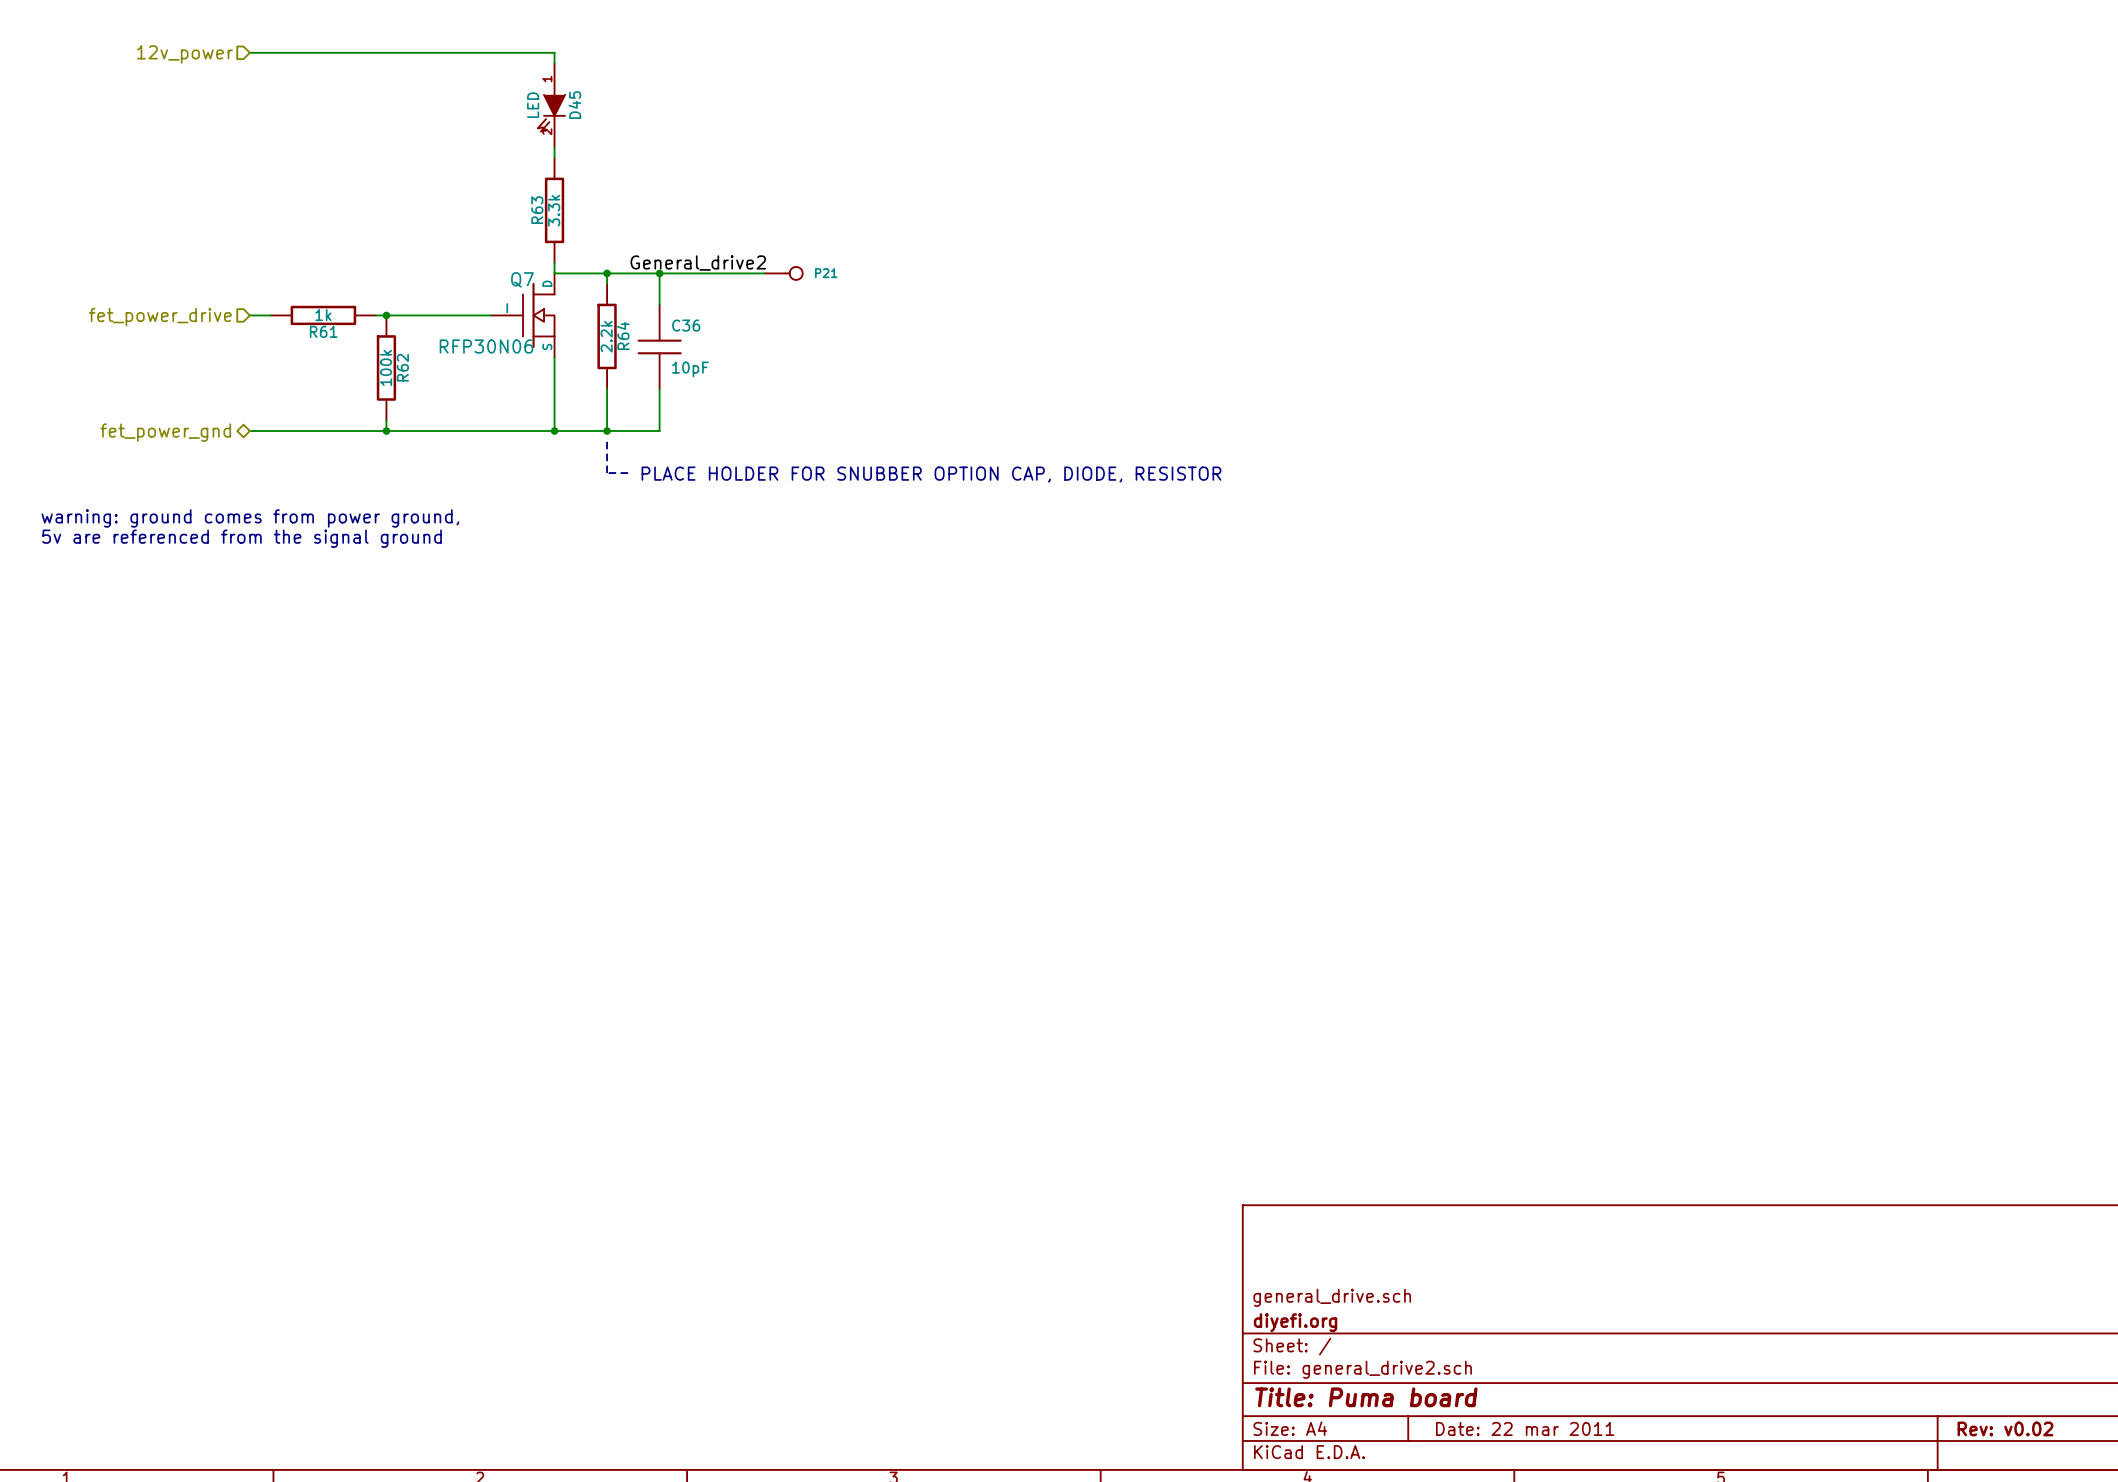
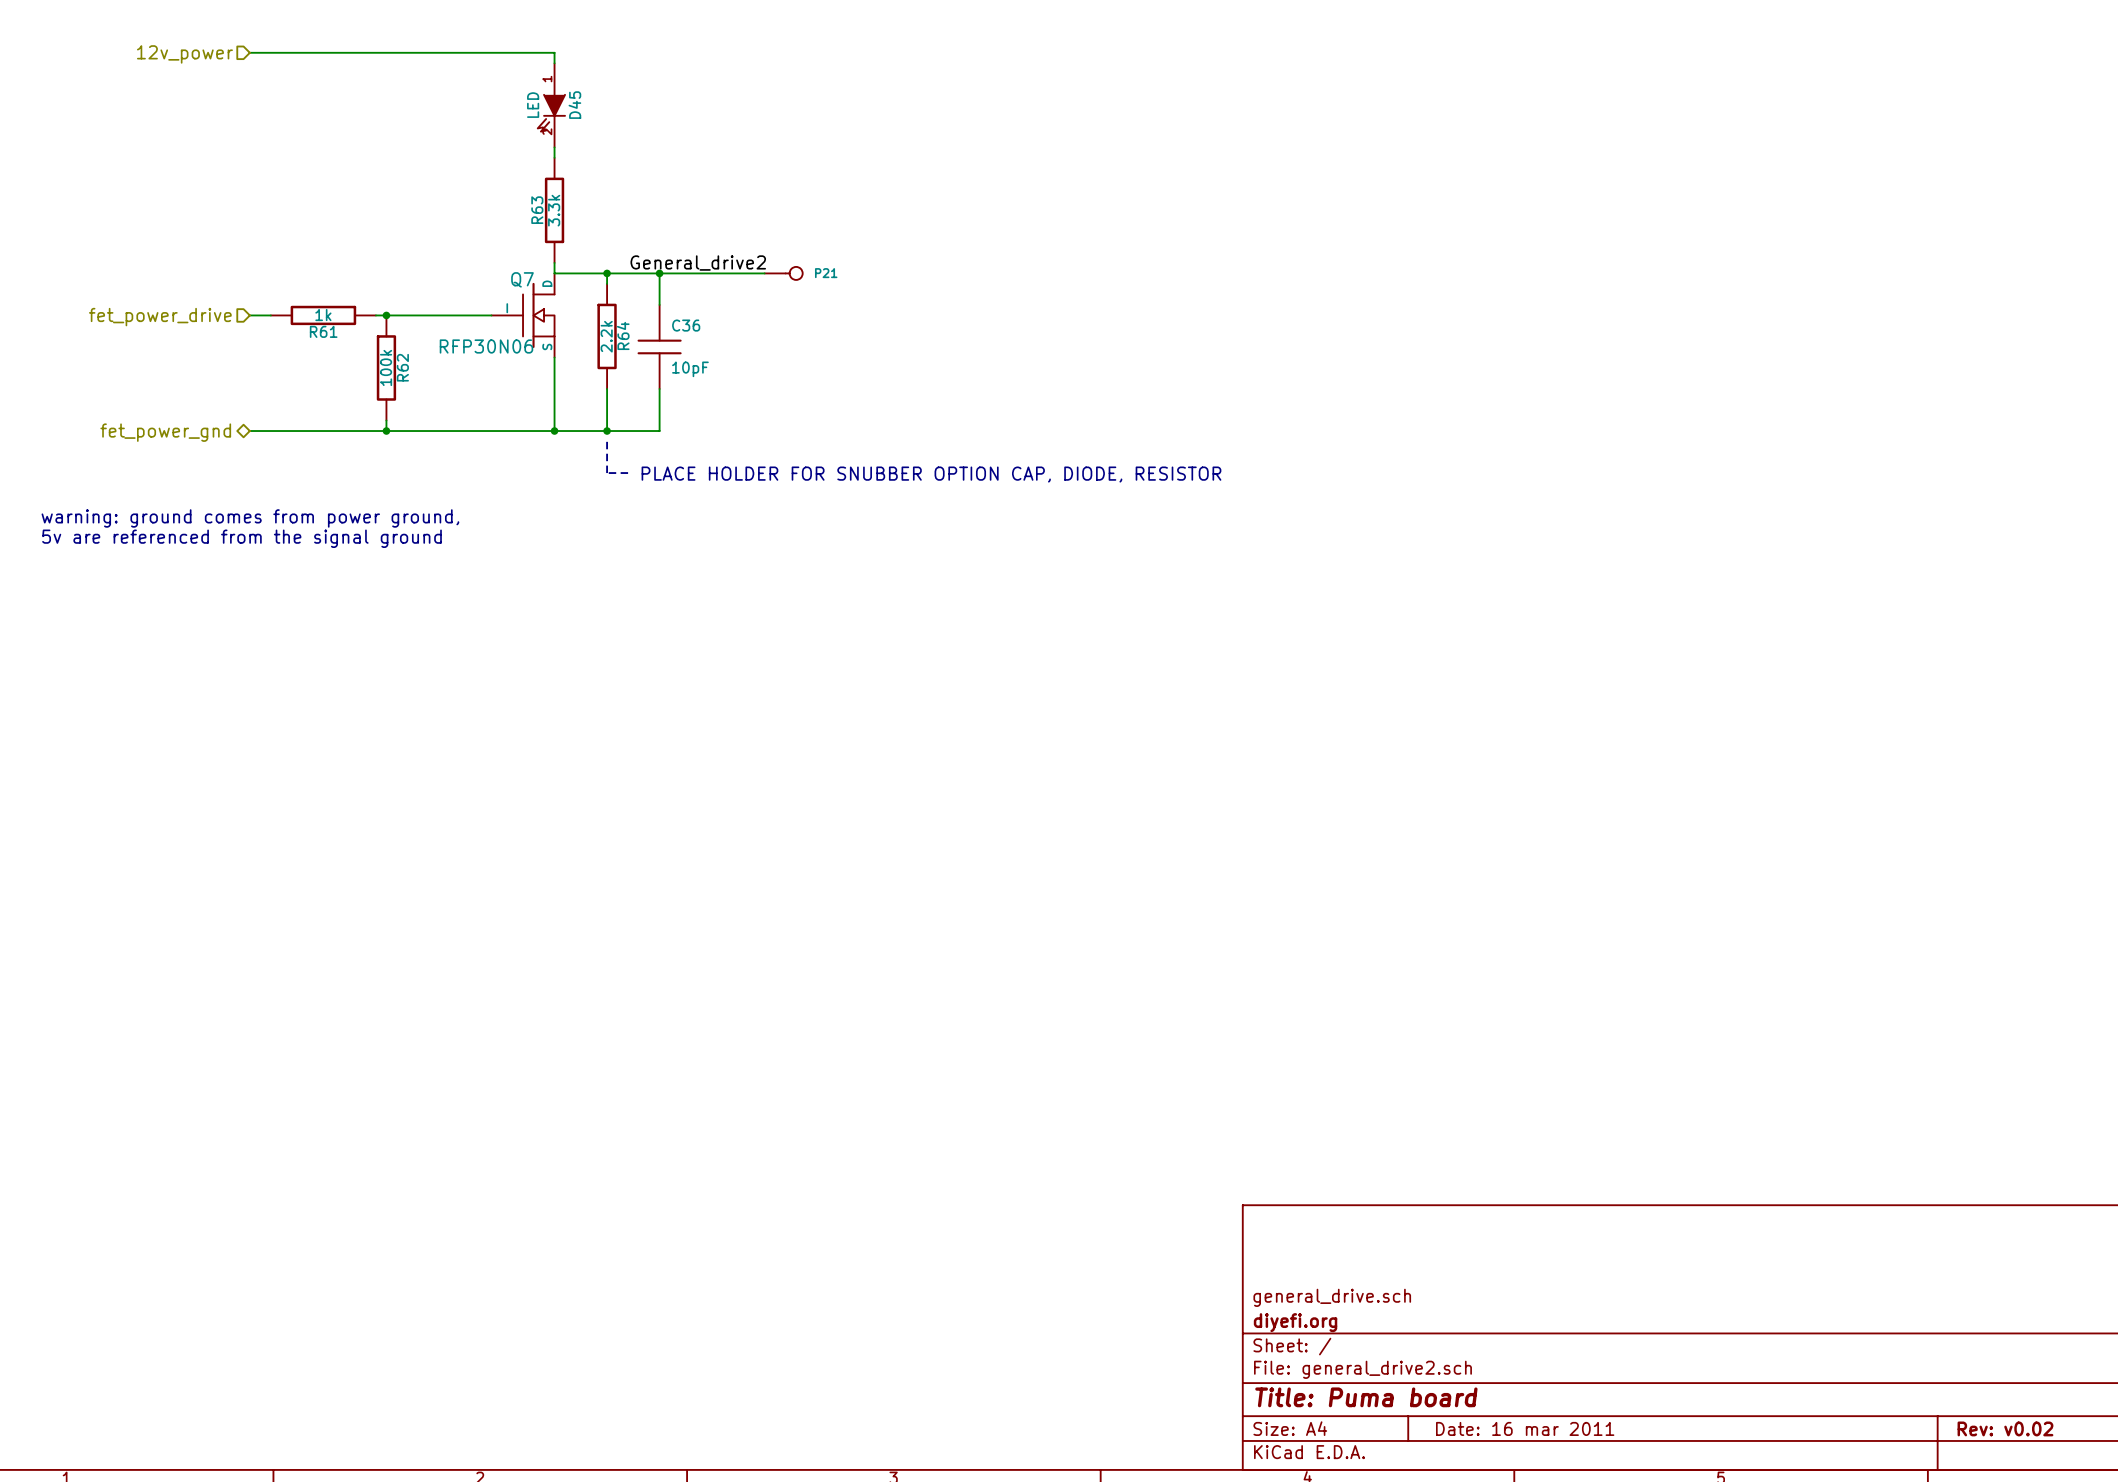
title block: Date: 22 mar 2011 (1525, 1428) -> Date: 16 mar 2011 (1525, 1428)

